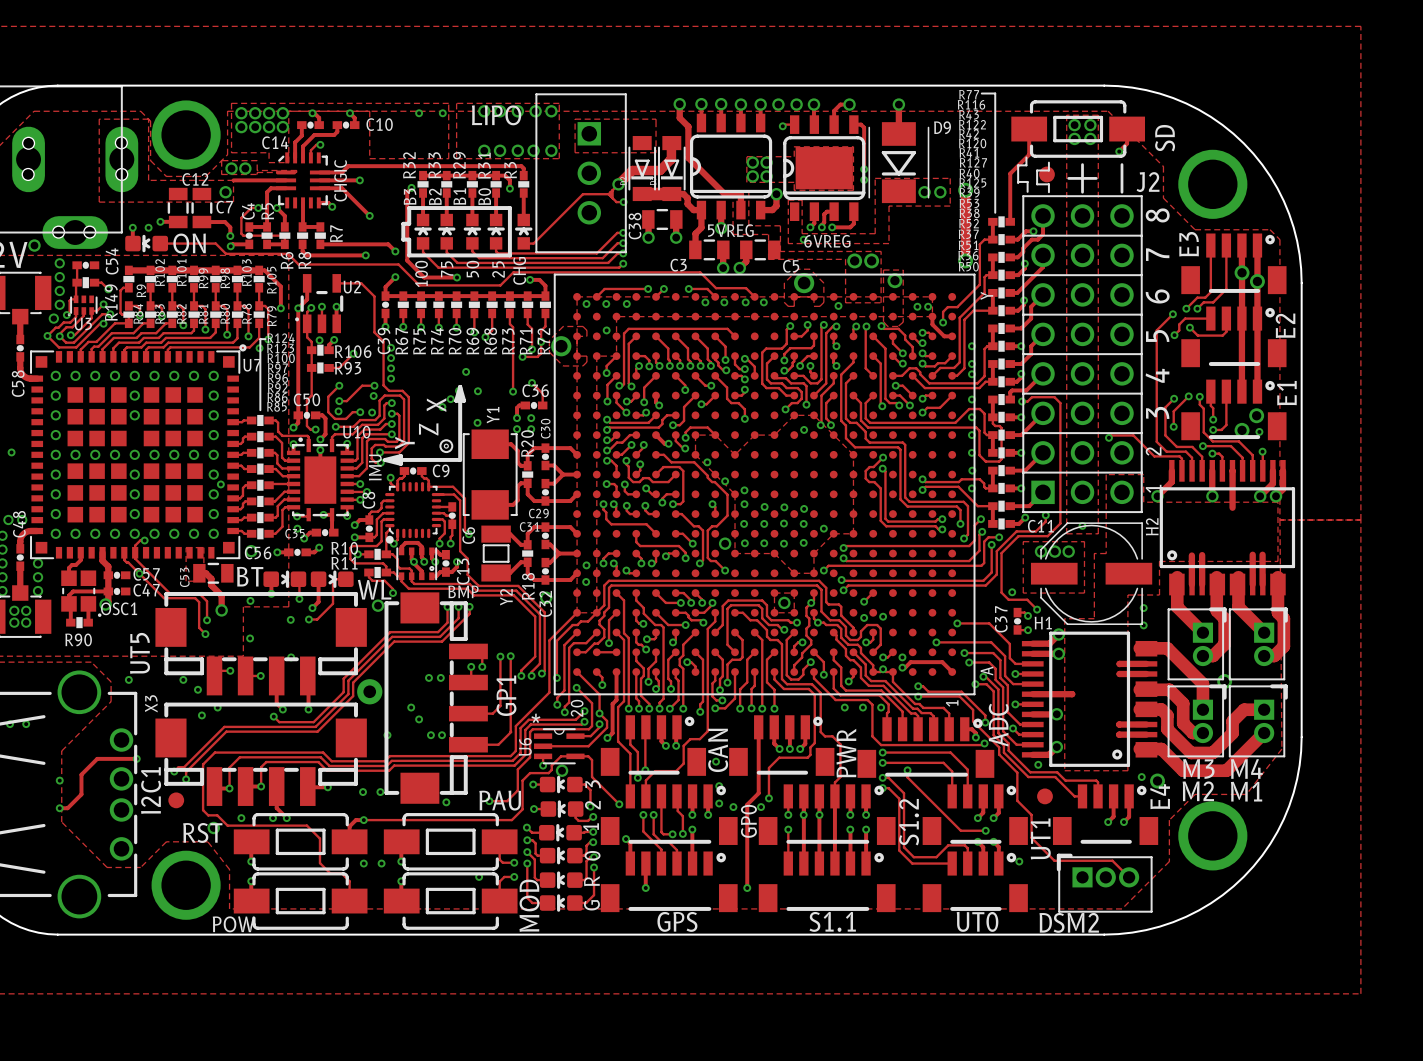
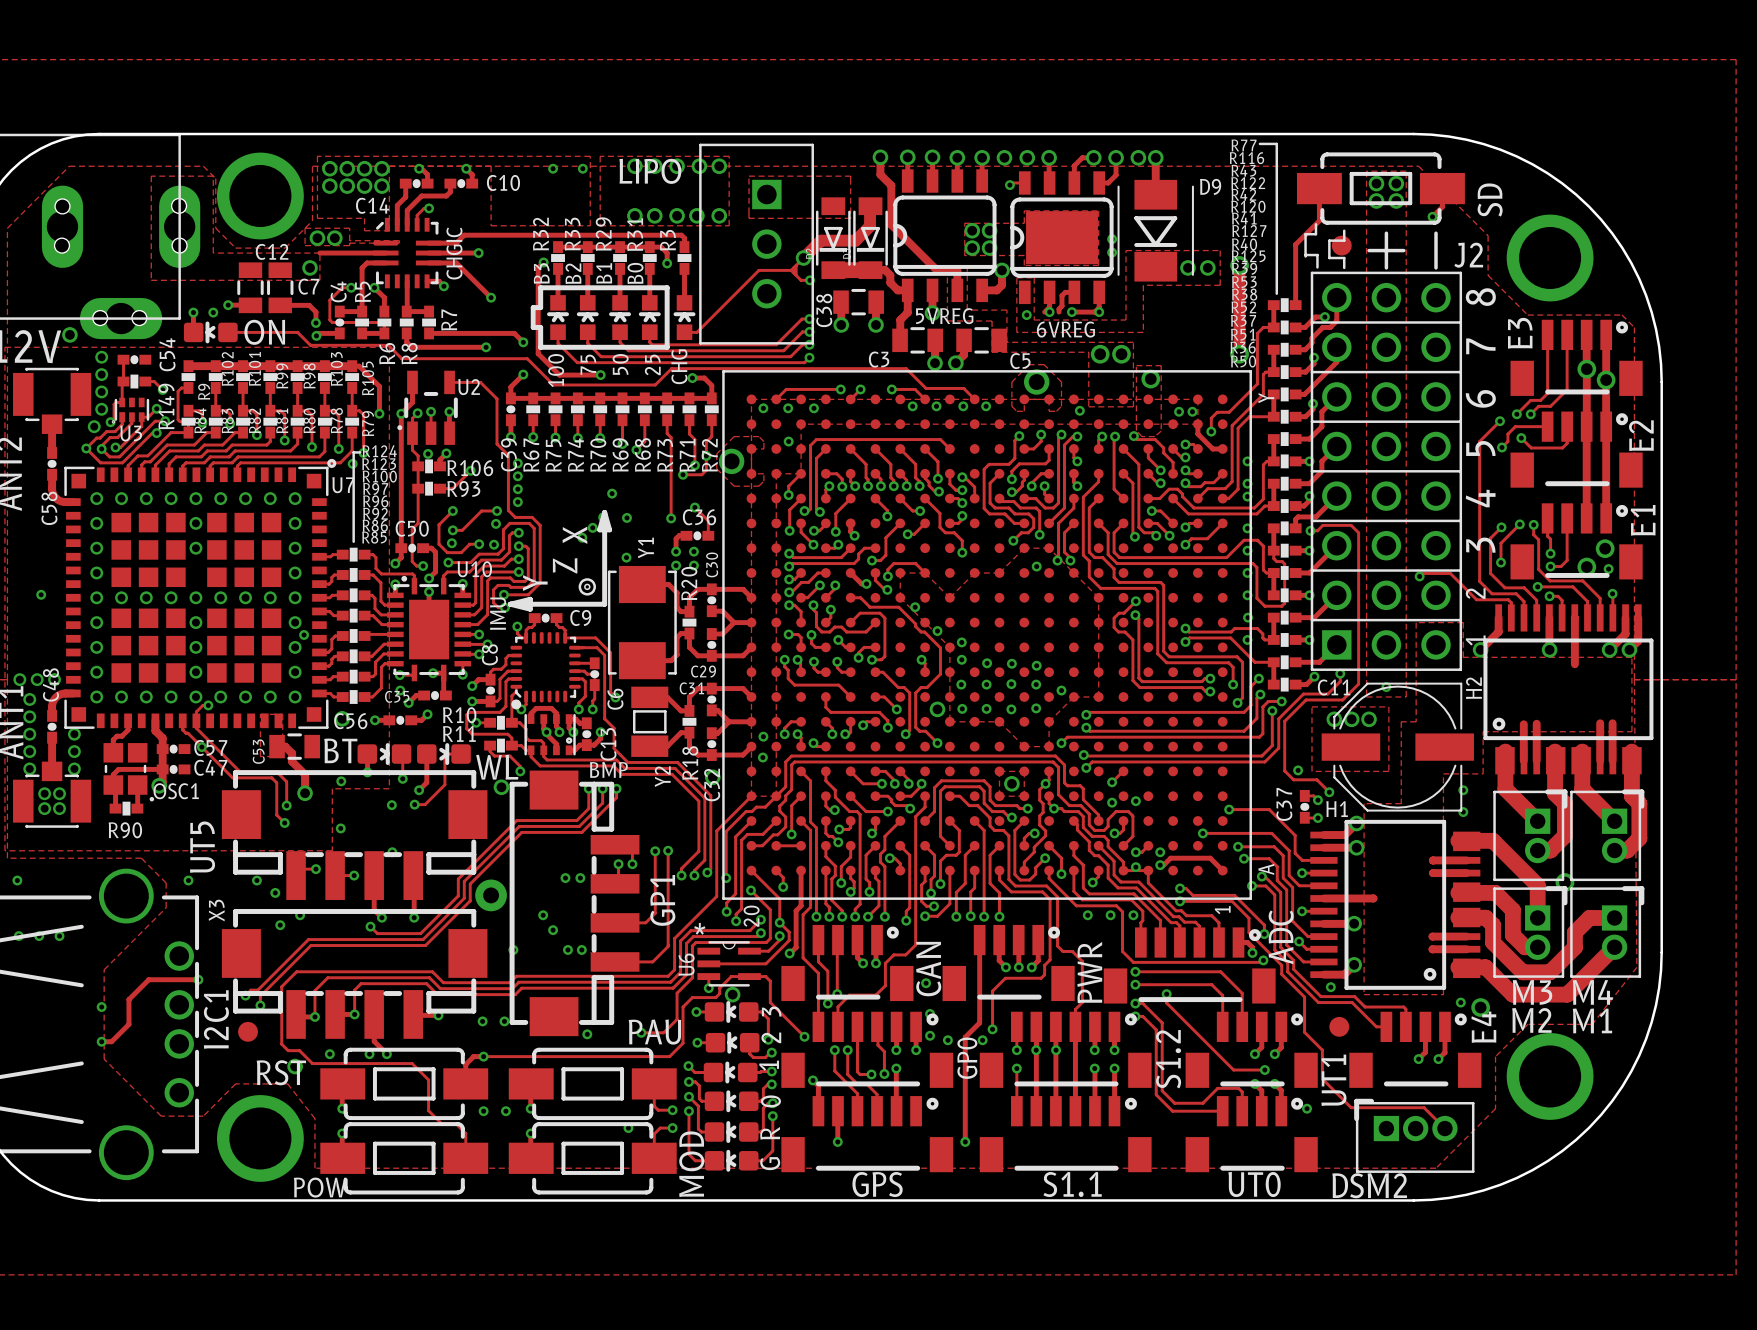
via: none -> (1116, 157)
via: none -> (1138, 157)
track: (861, 124) (864, 127) (864, 169) -> (1108, 182) (1116, 175) (1116, 157)
via: (810, 227) -> none
via: none -> (1049, 312)
via: (821, 227) -> none
via: none -> (1099, 312)
via: none -> (1026, 315)
via: (803, 239) -> none

